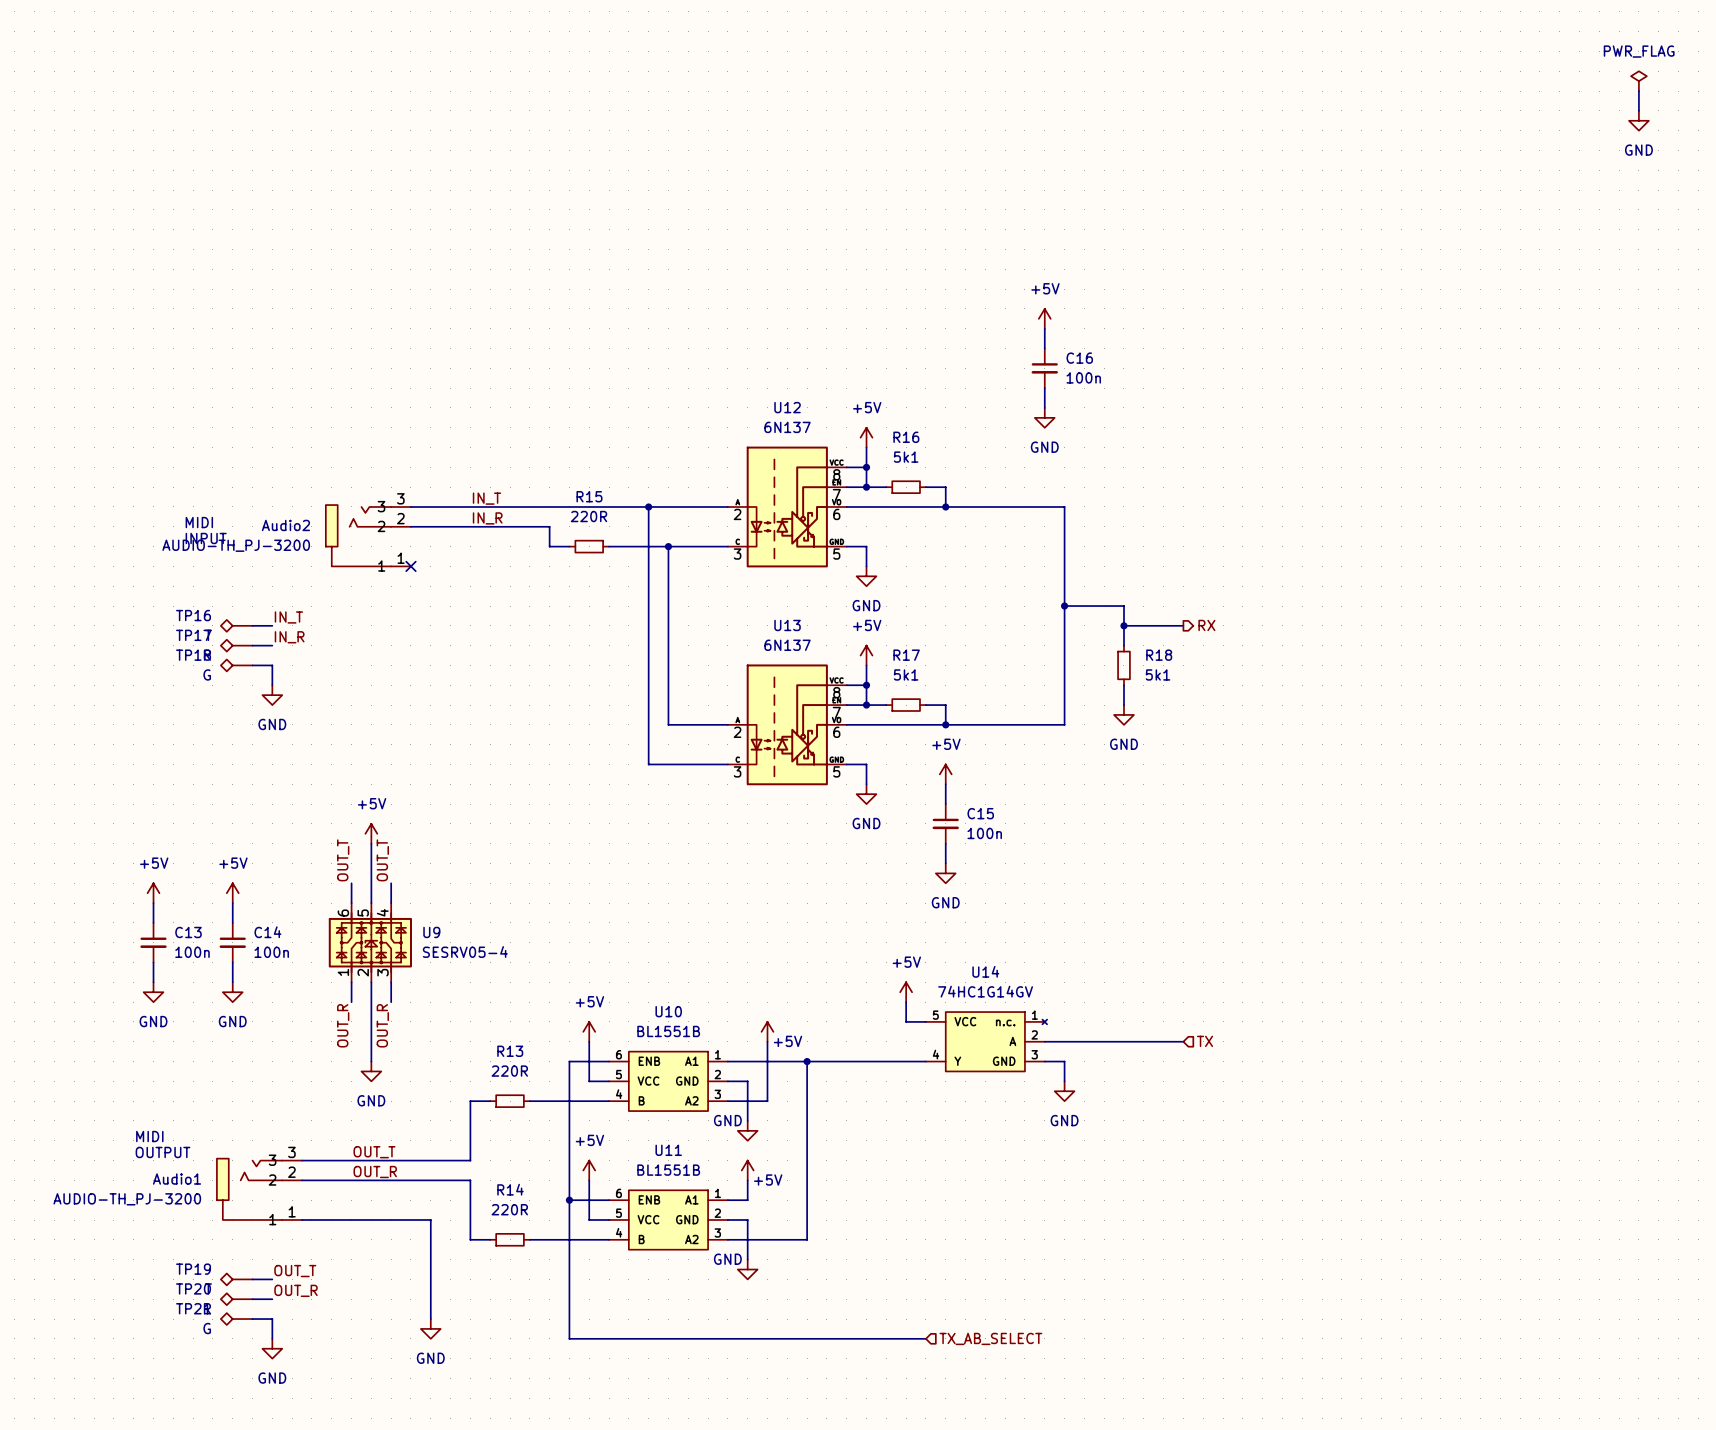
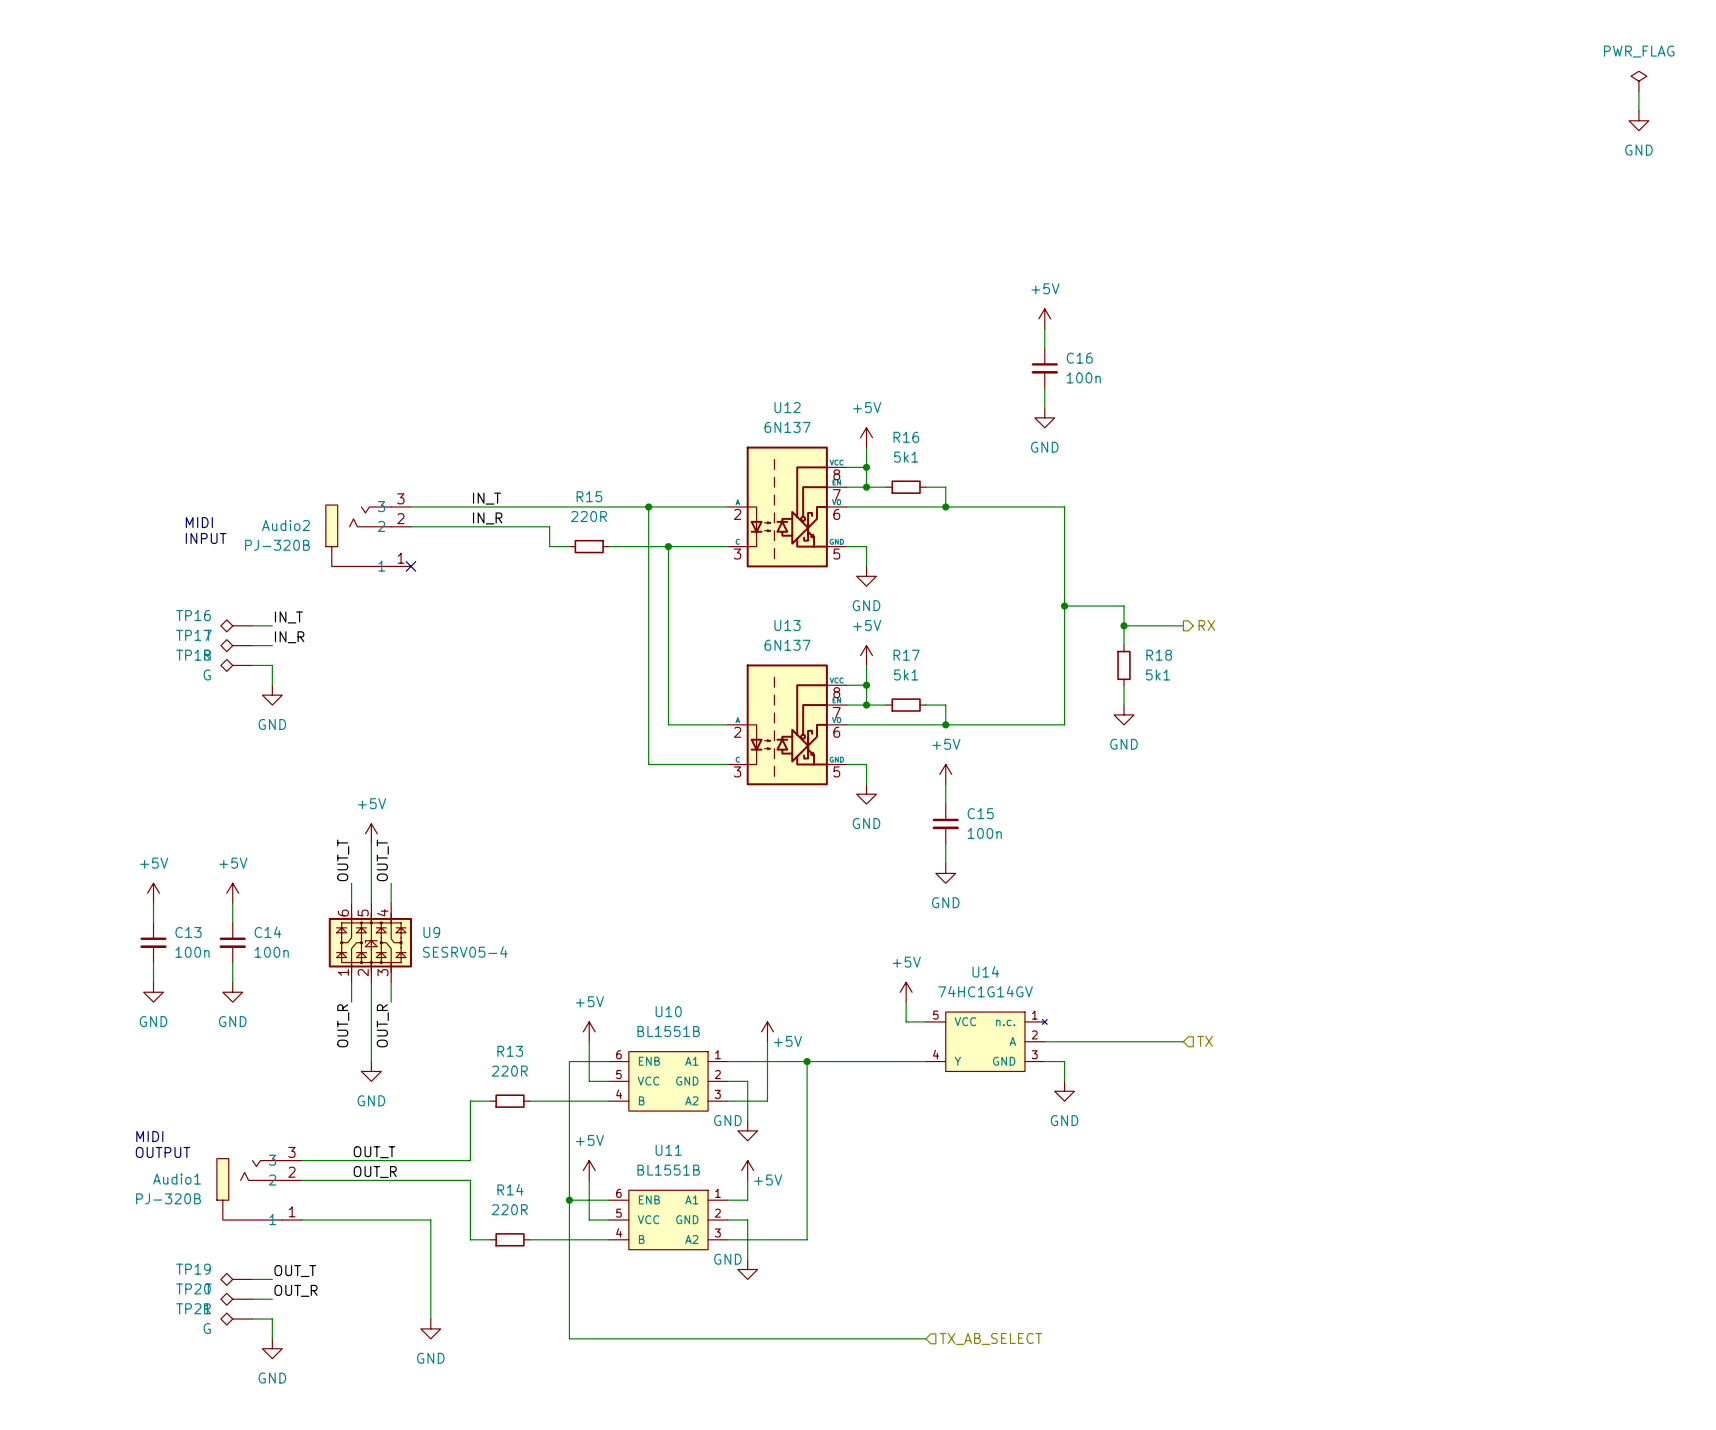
Audio2 value: AUDIO-TH_PJ-3200 (236, 545) -> PJ-320B (277, 545)
Audio1 value: AUDIO-TH_PJ-3200 (127, 1199) -> PJ-320B (168, 1198)

